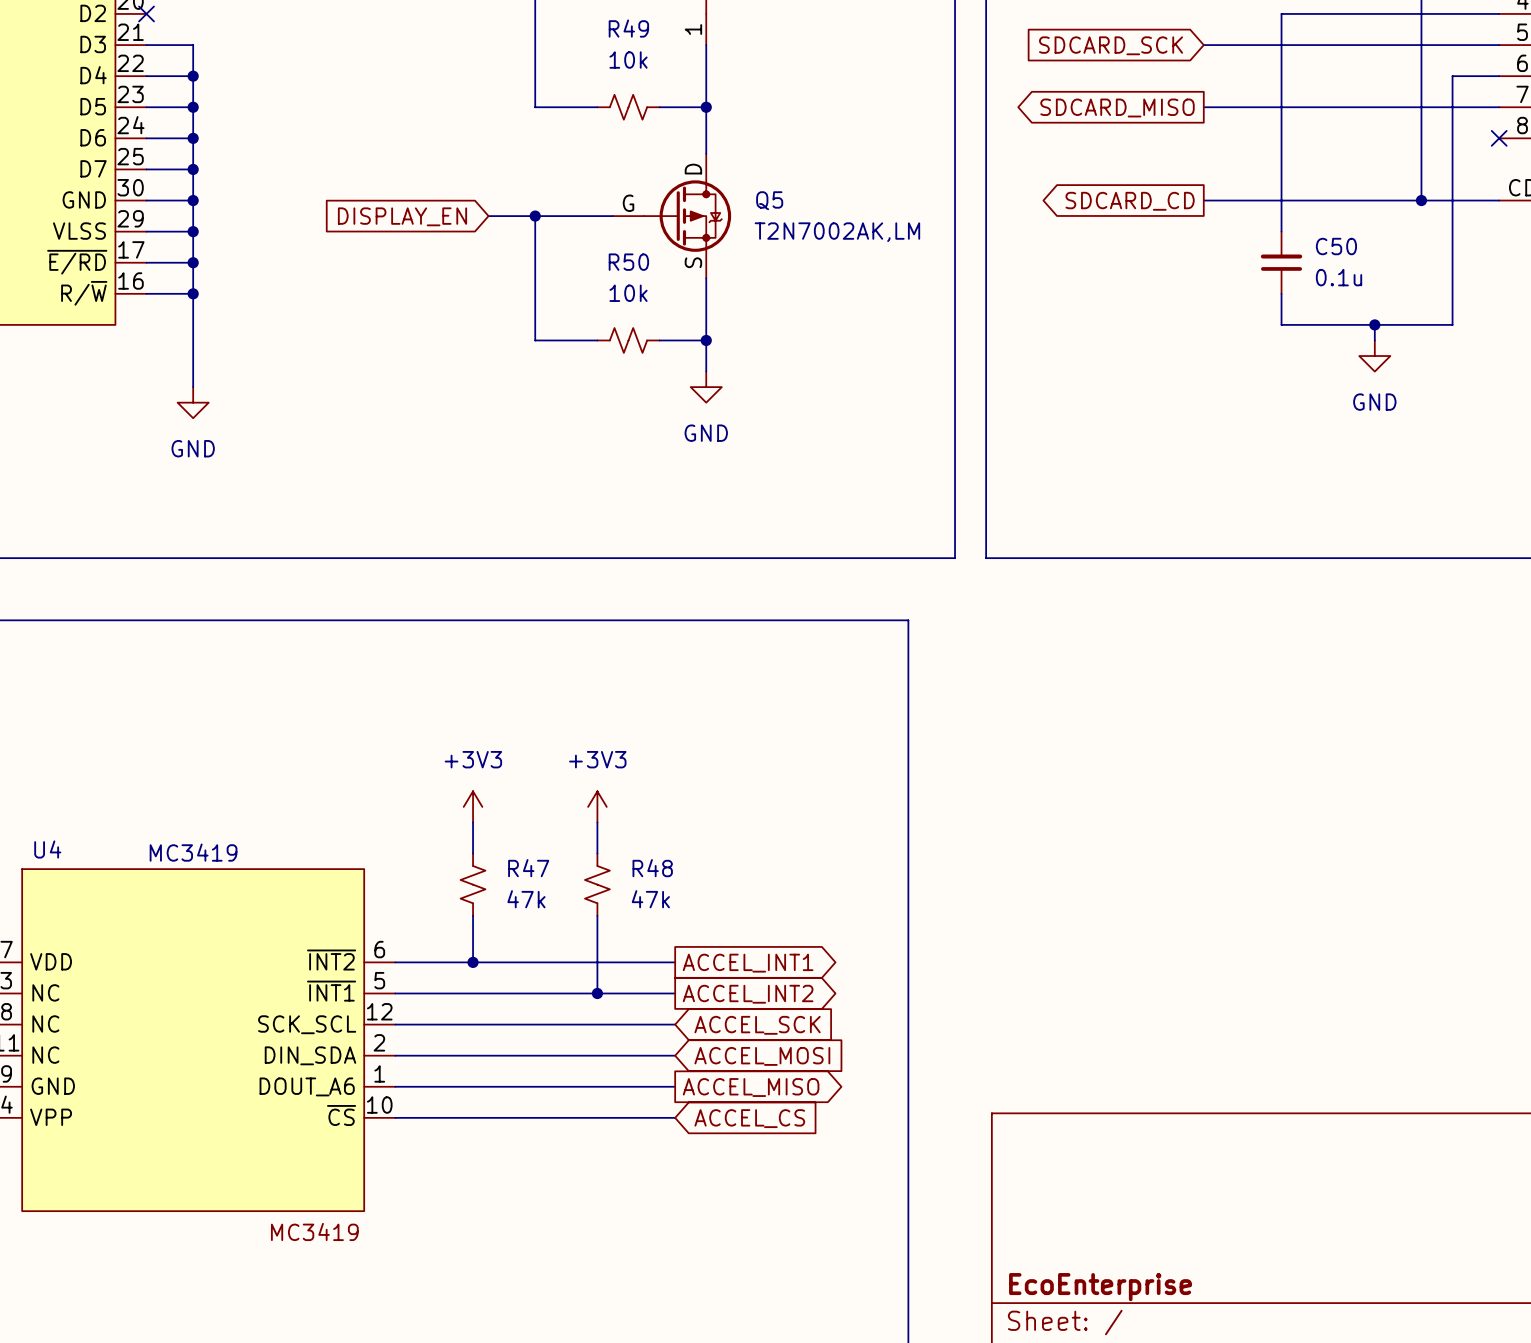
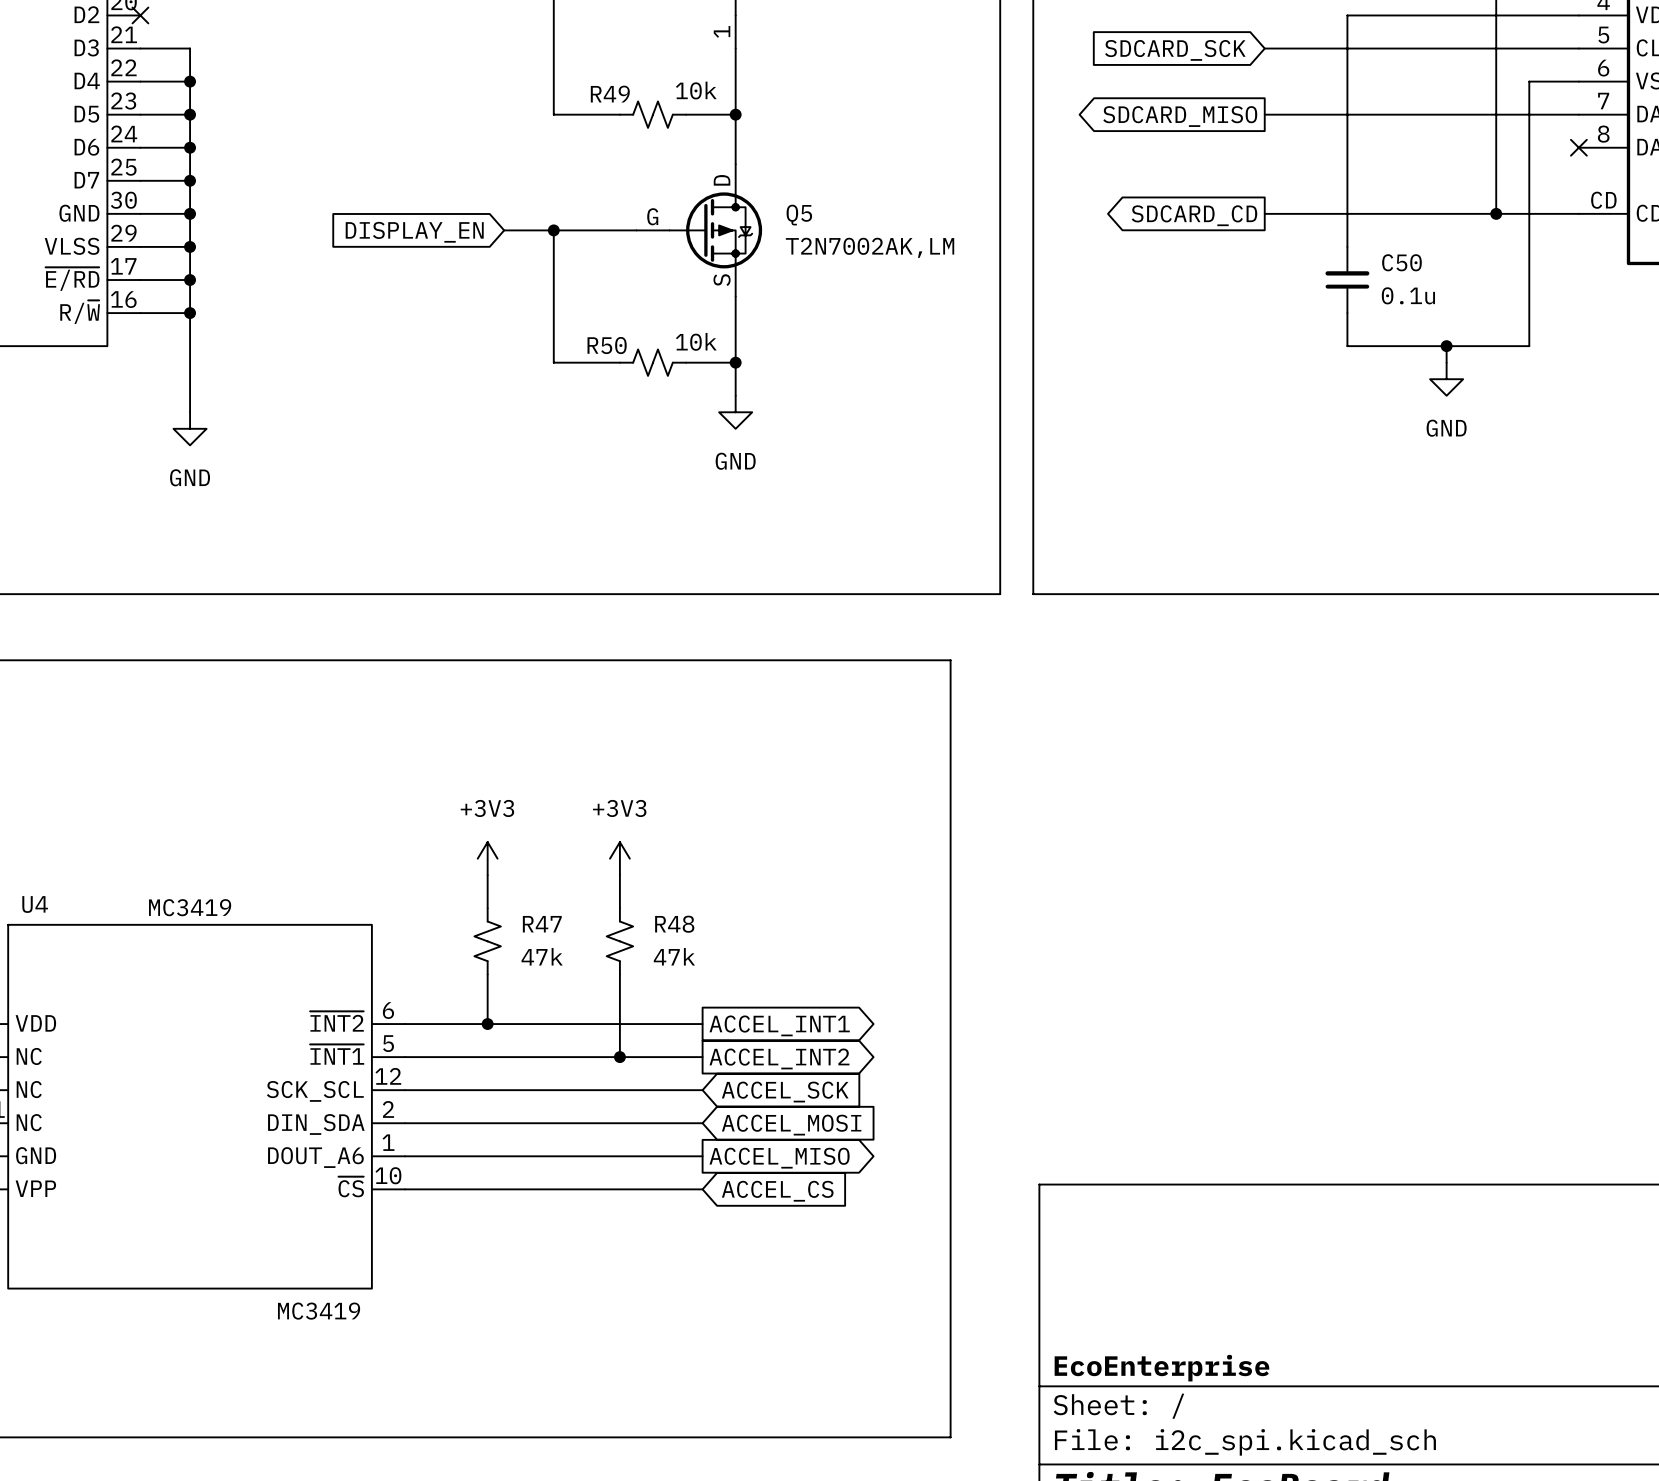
R49 name position: R49 (628, 28) -> R49 (610, 94)
R49 value position: 10k (628, 60) -> 10k (696, 90)
R50 name position: R50 (628, 262) -> R50 (607, 345)
R50 value position: 10k (628, 293) -> 10k (696, 341)

